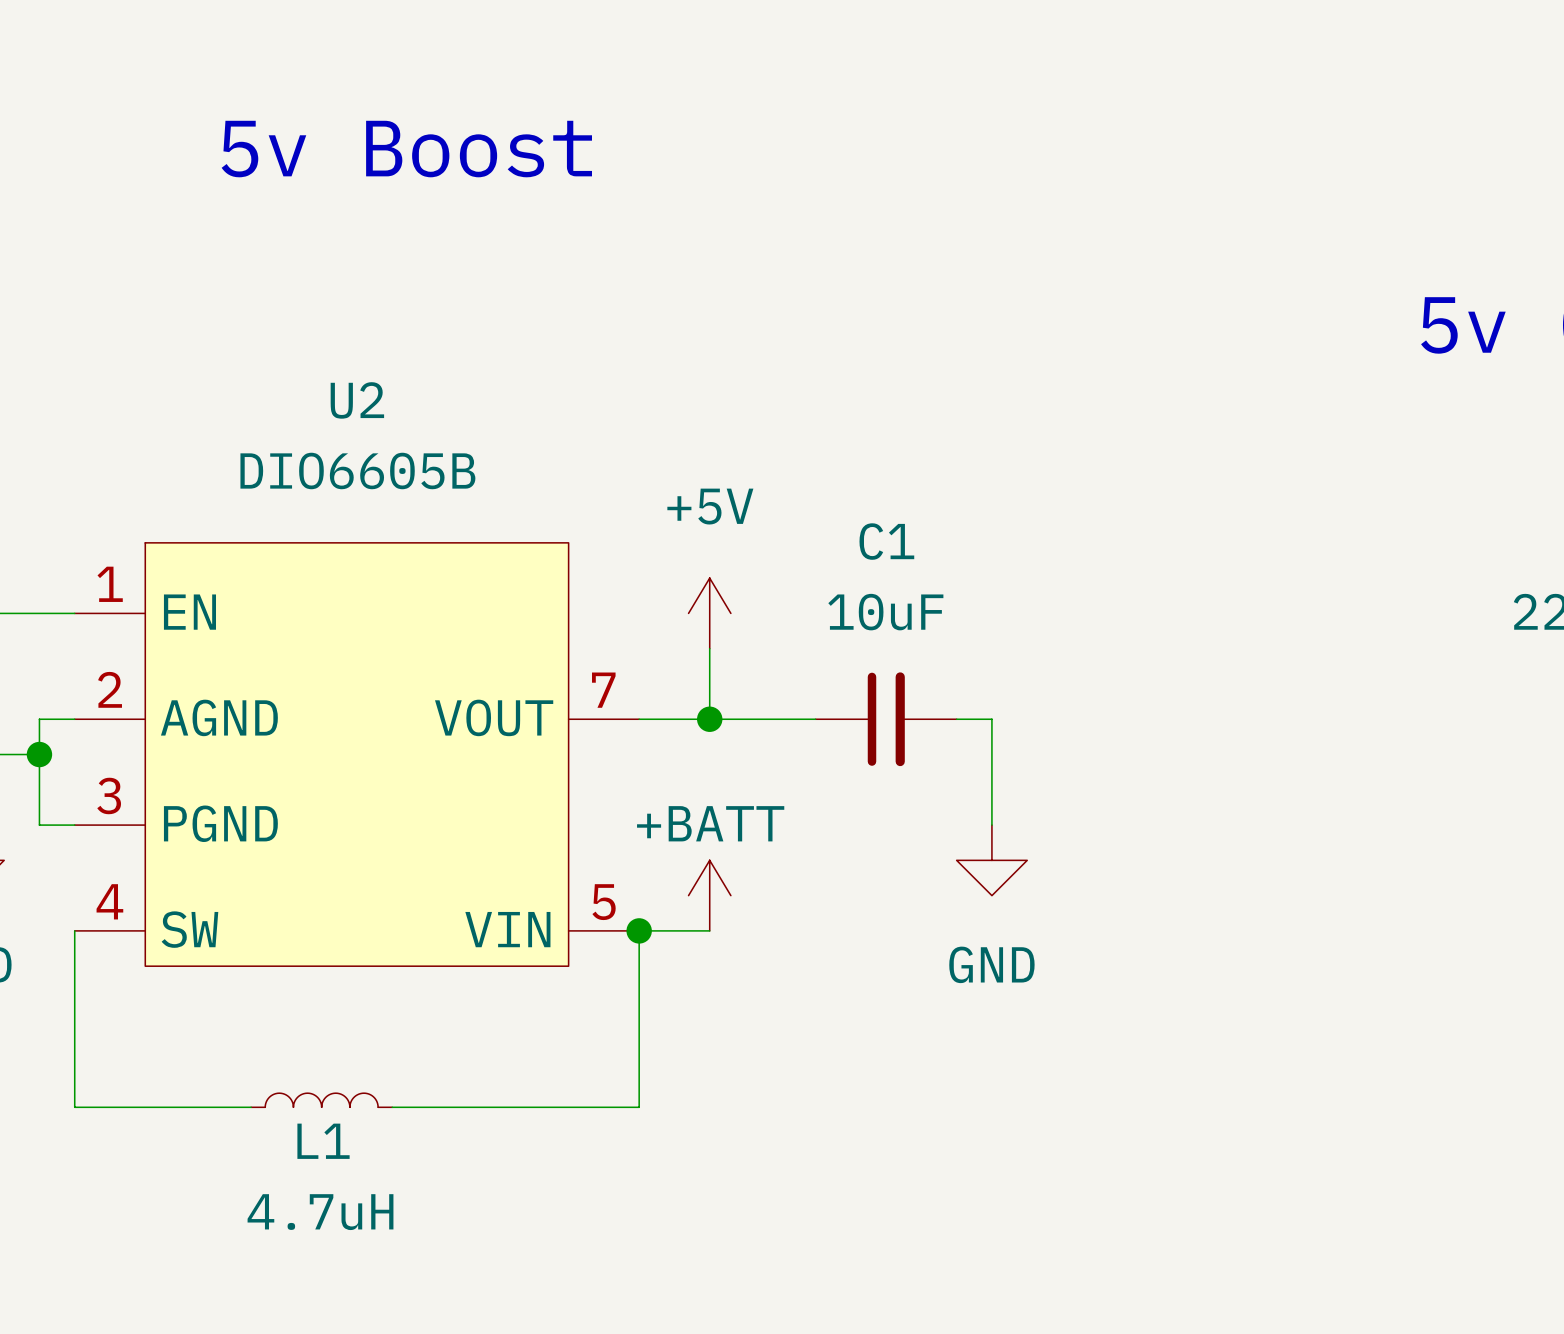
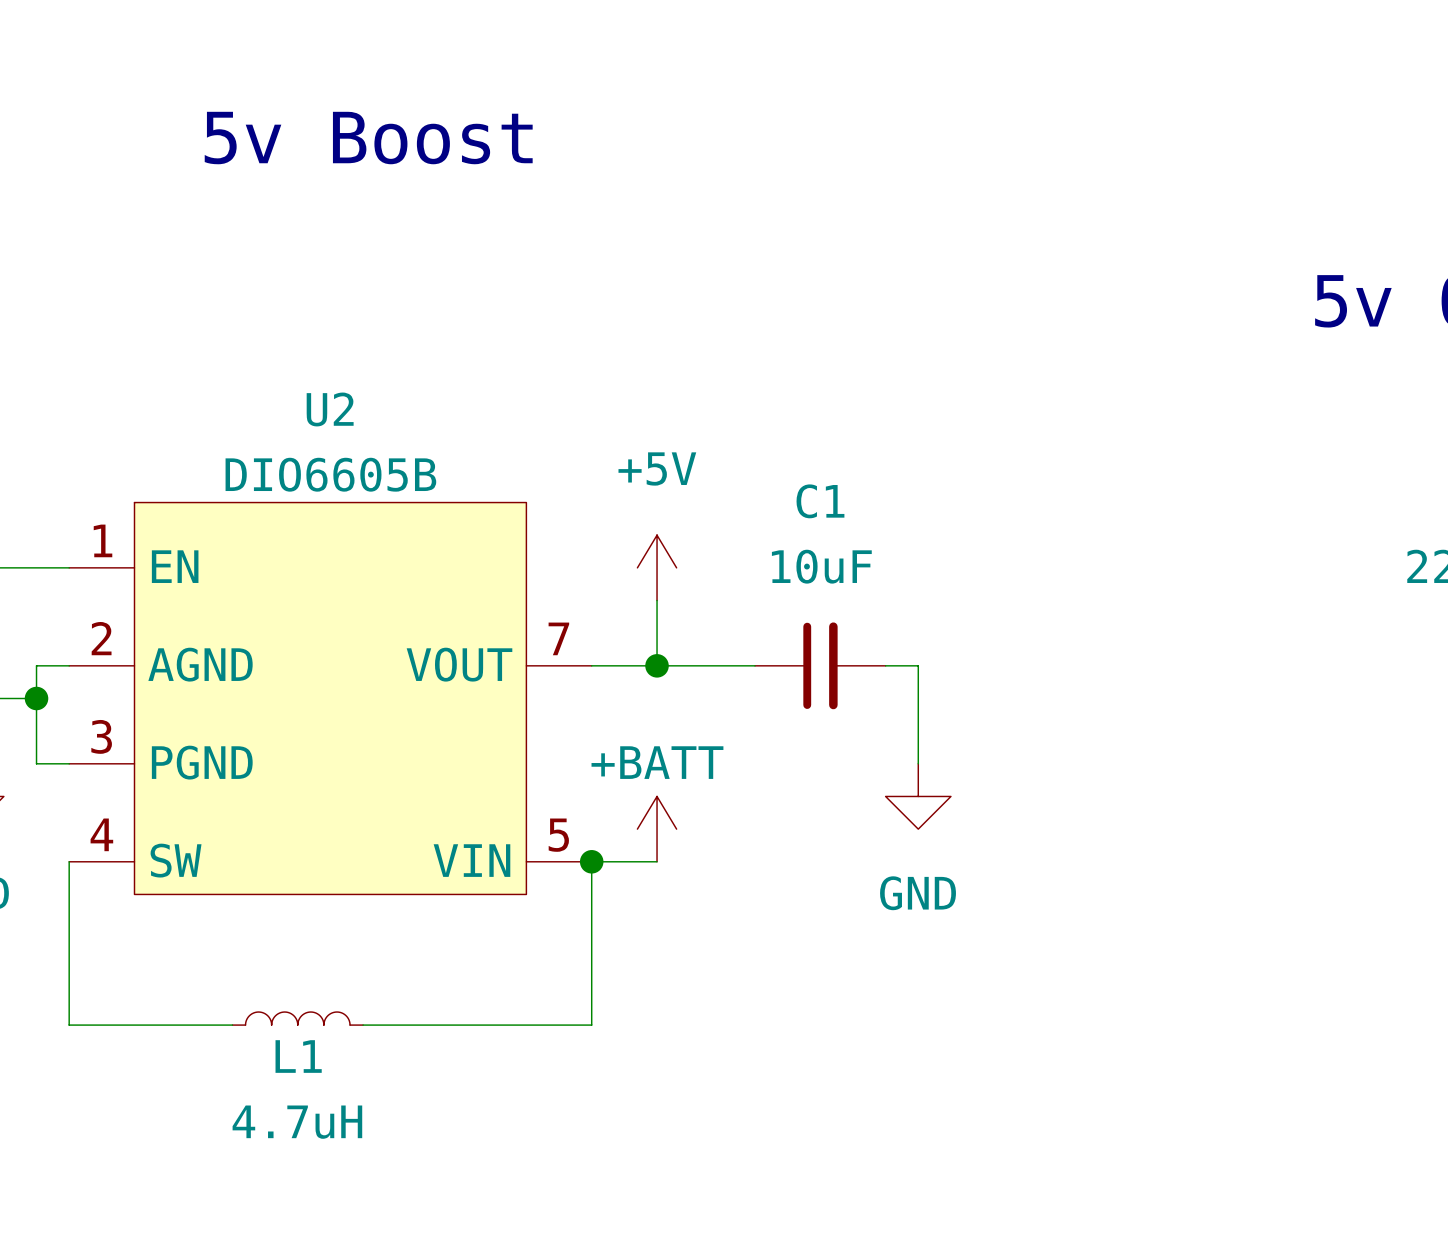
U2 name position: U2 (357, 400) -> U2 (330, 409)
U2 value position: DIO6605B (357, 470) -> DIO6605B (330, 474)

